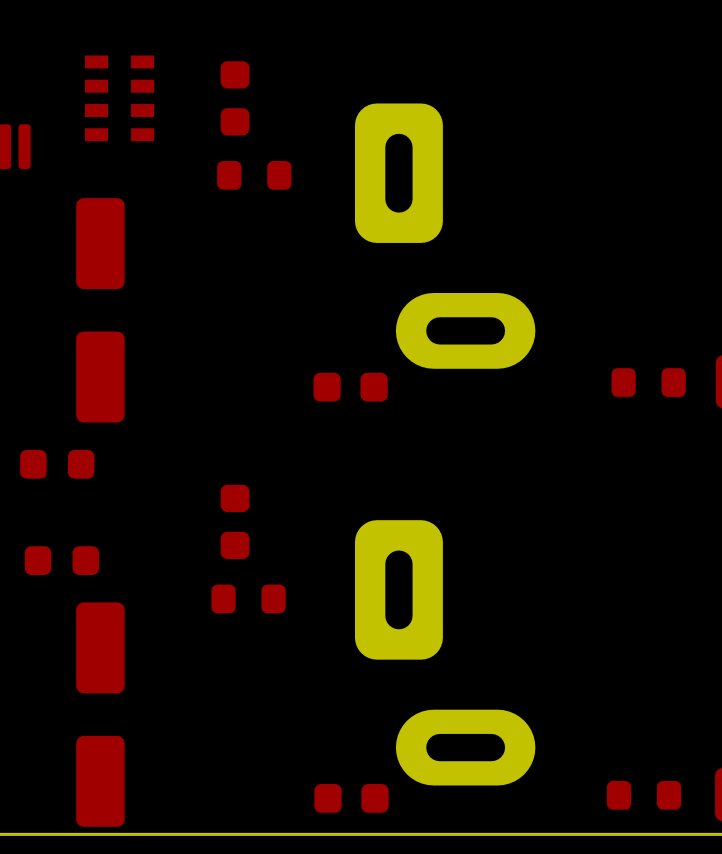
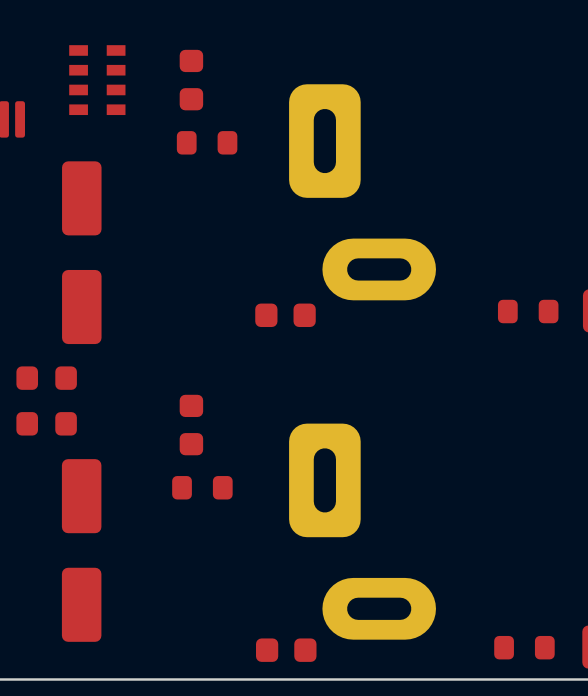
part position: (61, 560) -> (46, 423)
part position: (100, 714) -> (81, 550)

